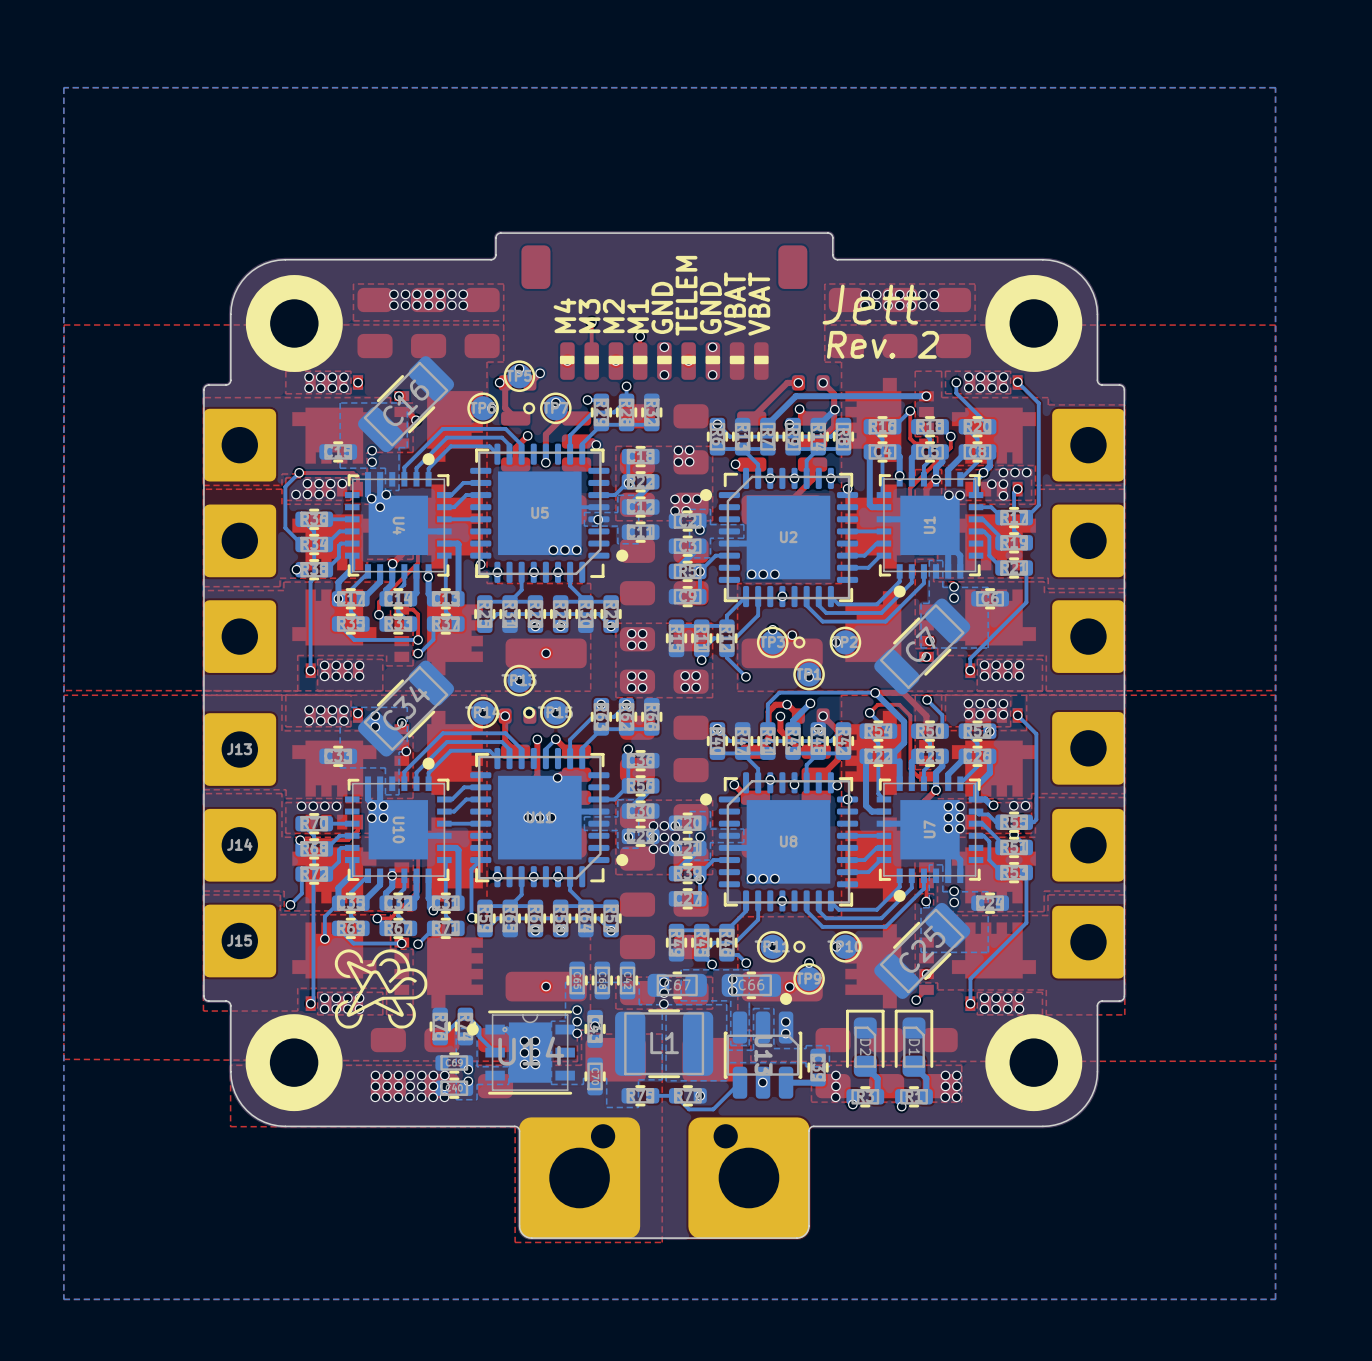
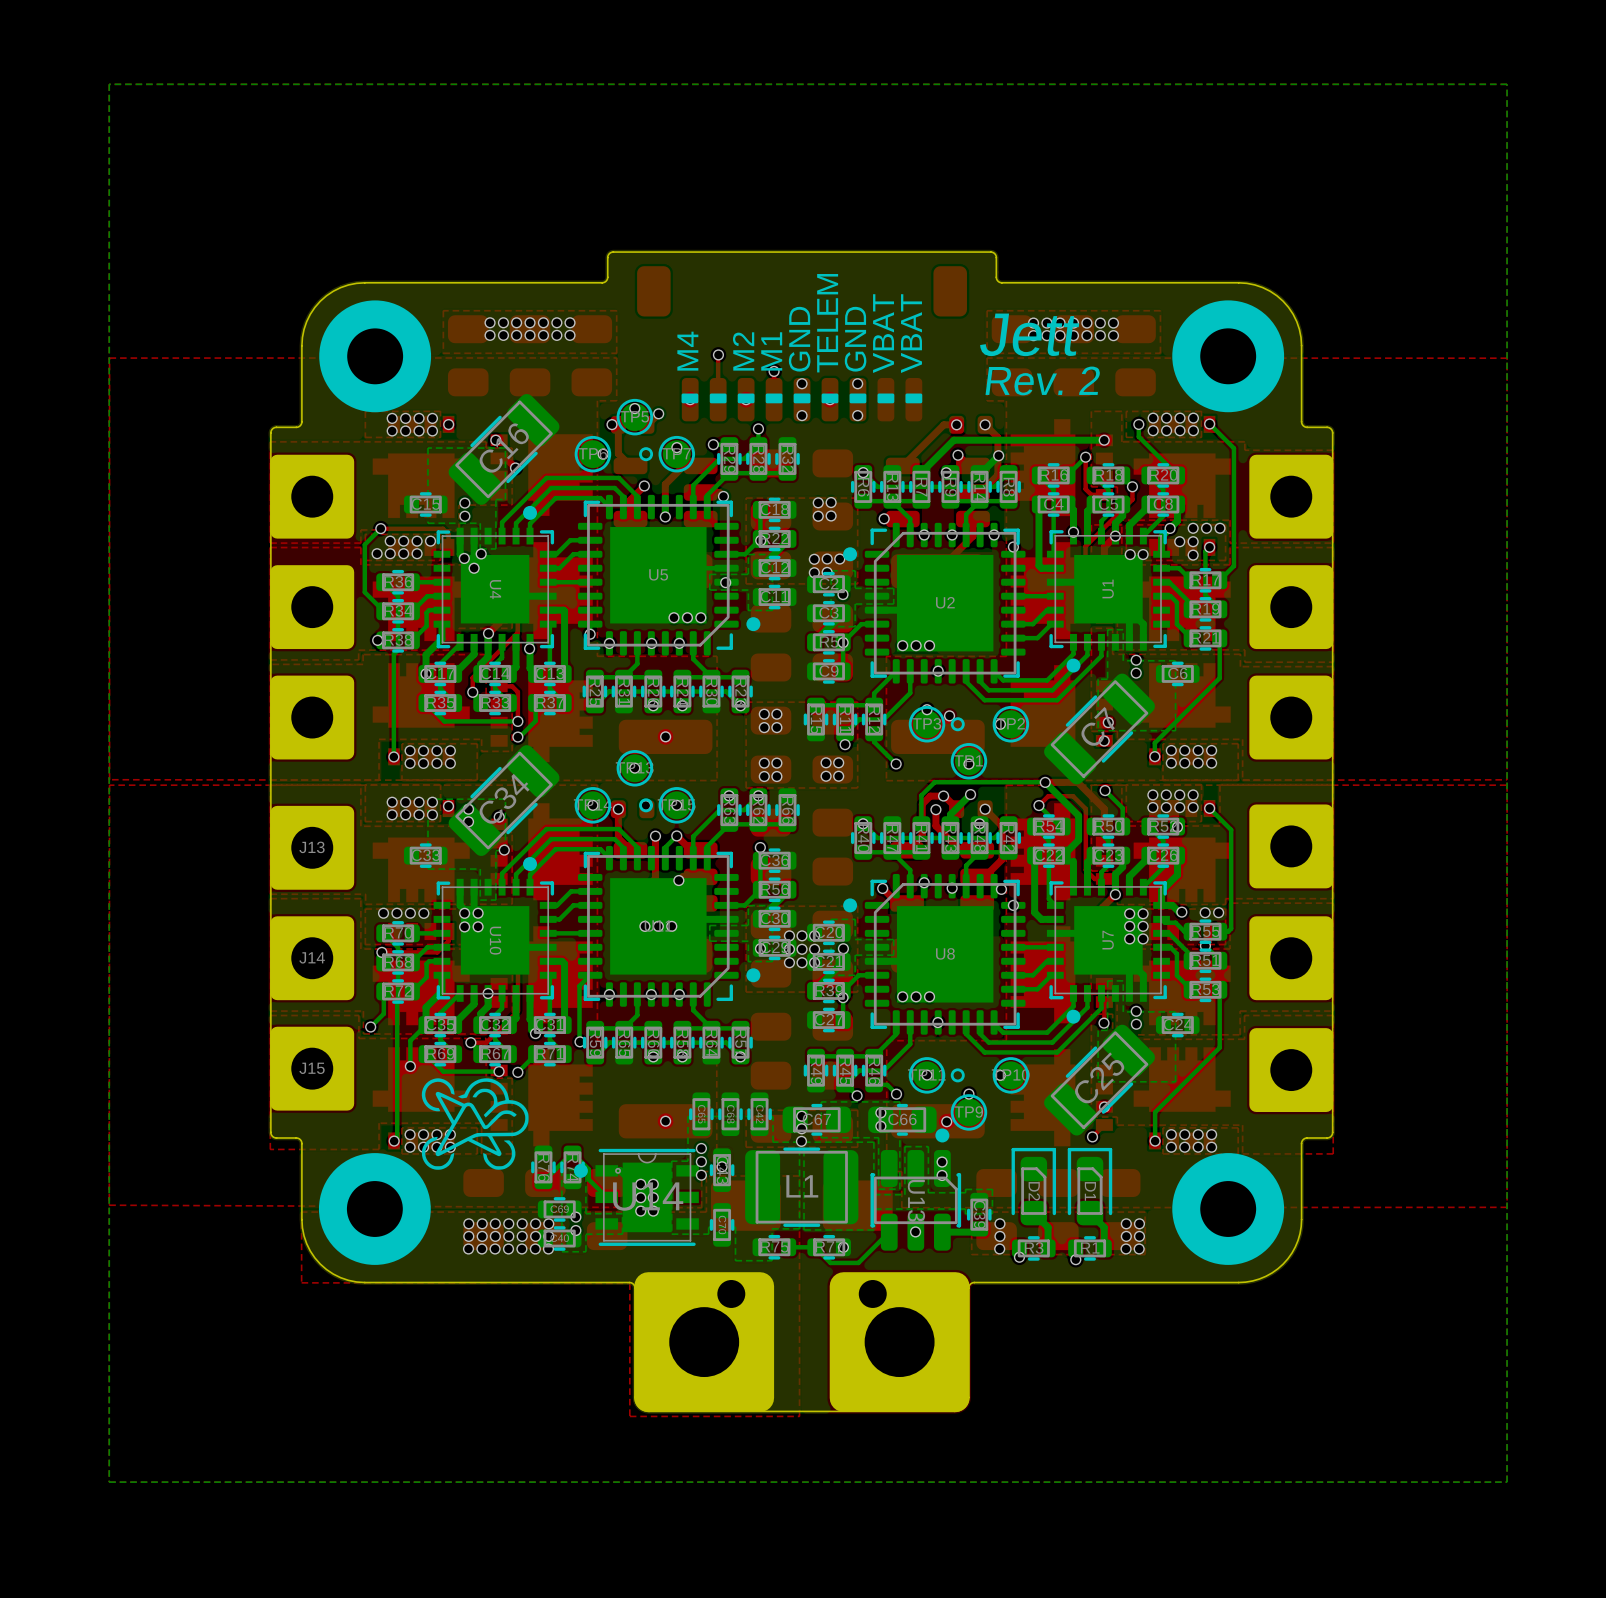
text: M3 (589, 316) -> none

